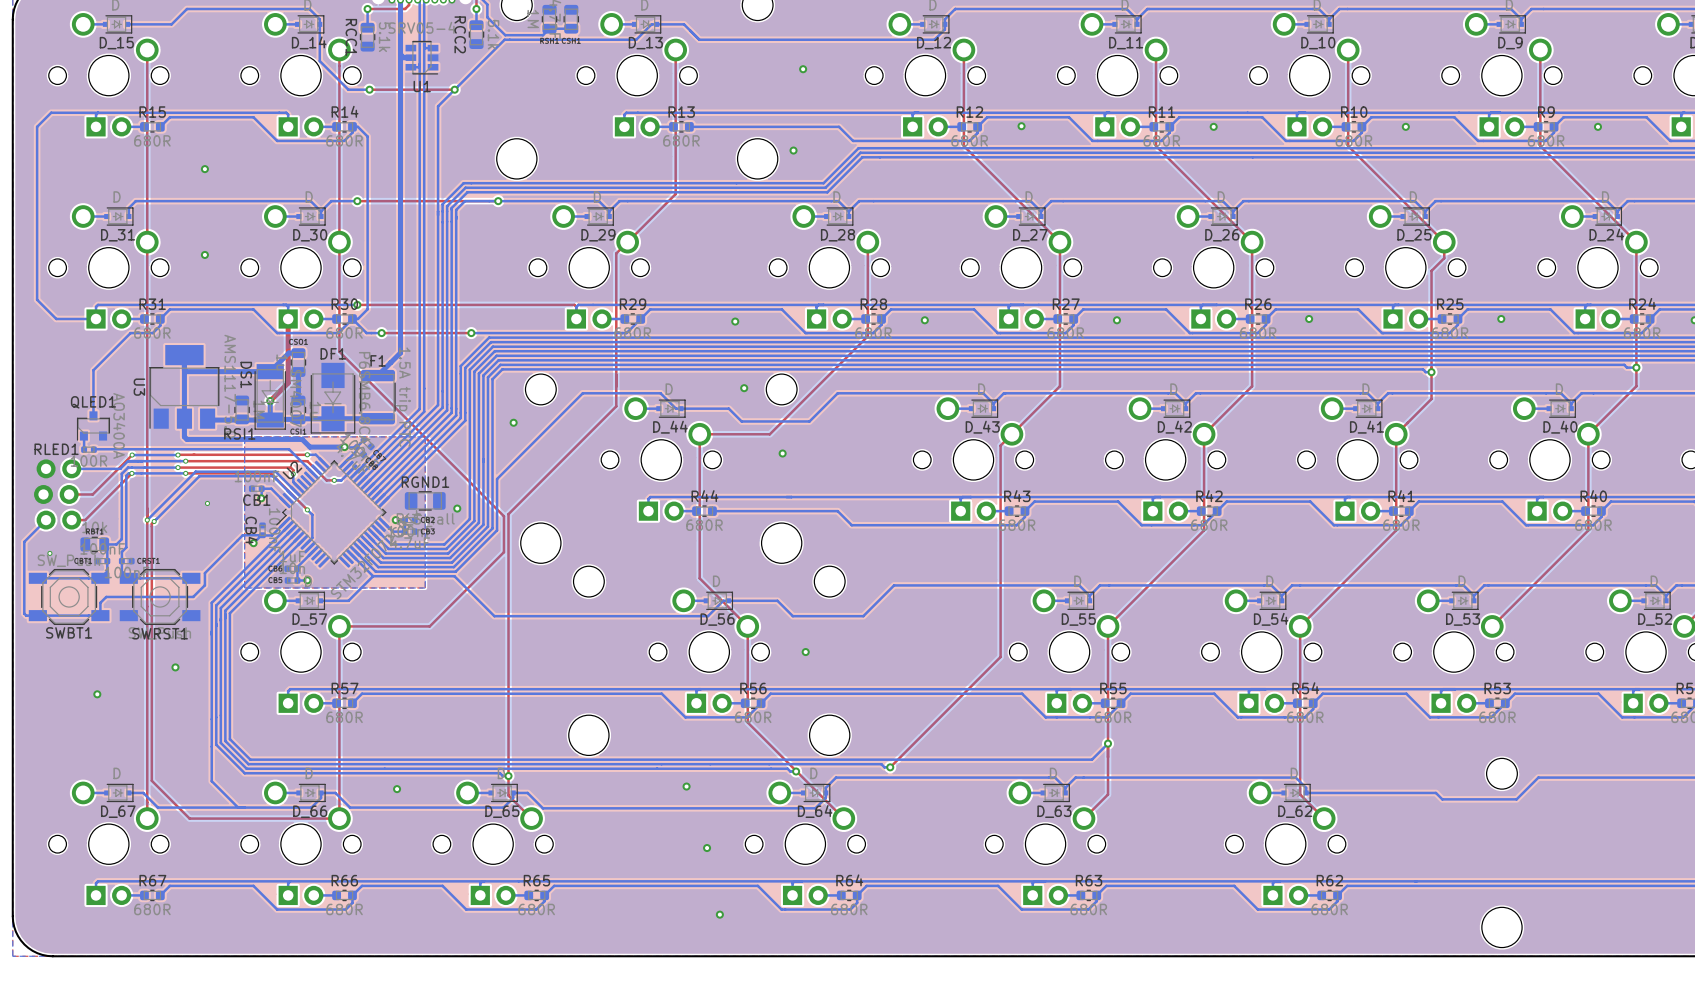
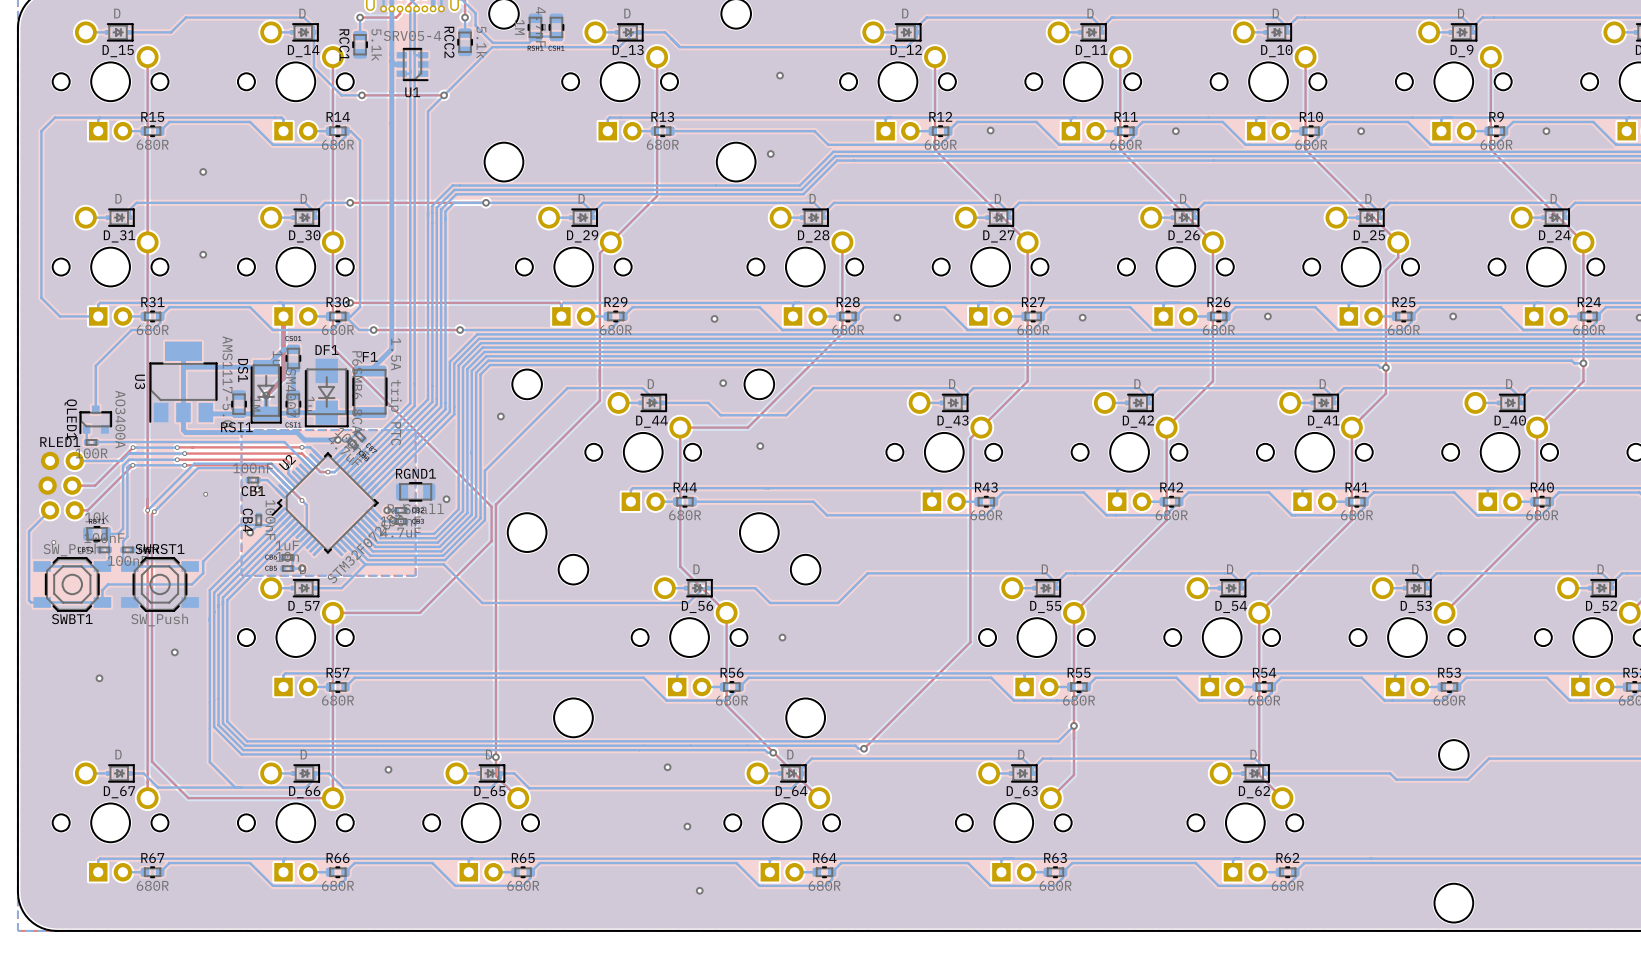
QLED1 name rotation: 0° (93, 402) -> 90° clockwise (70, 419)
SWRST1 name position: SWRST1 (160, 633) -> SWRST1 (159, 549)

